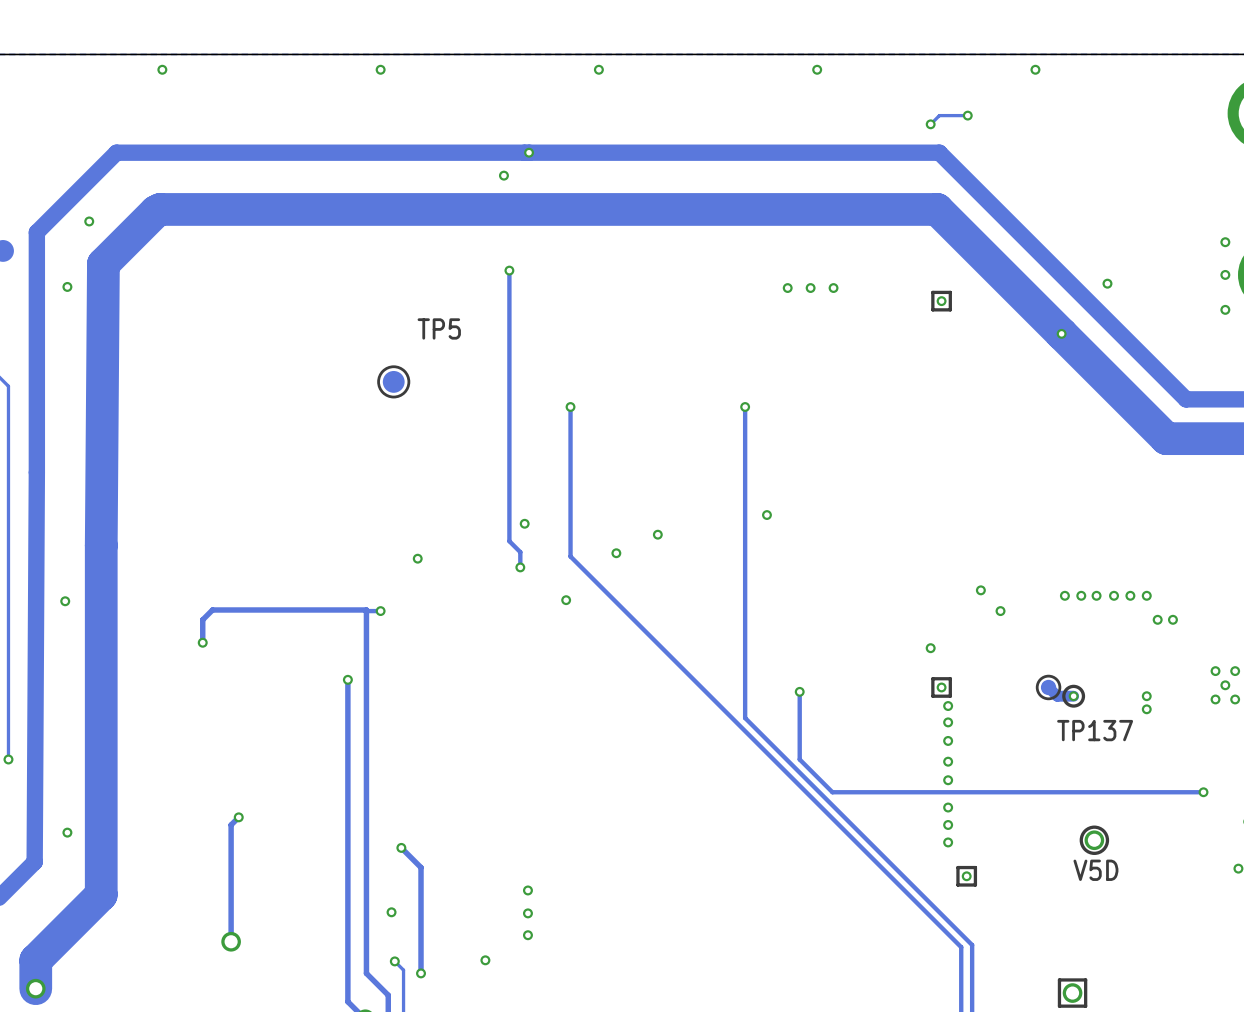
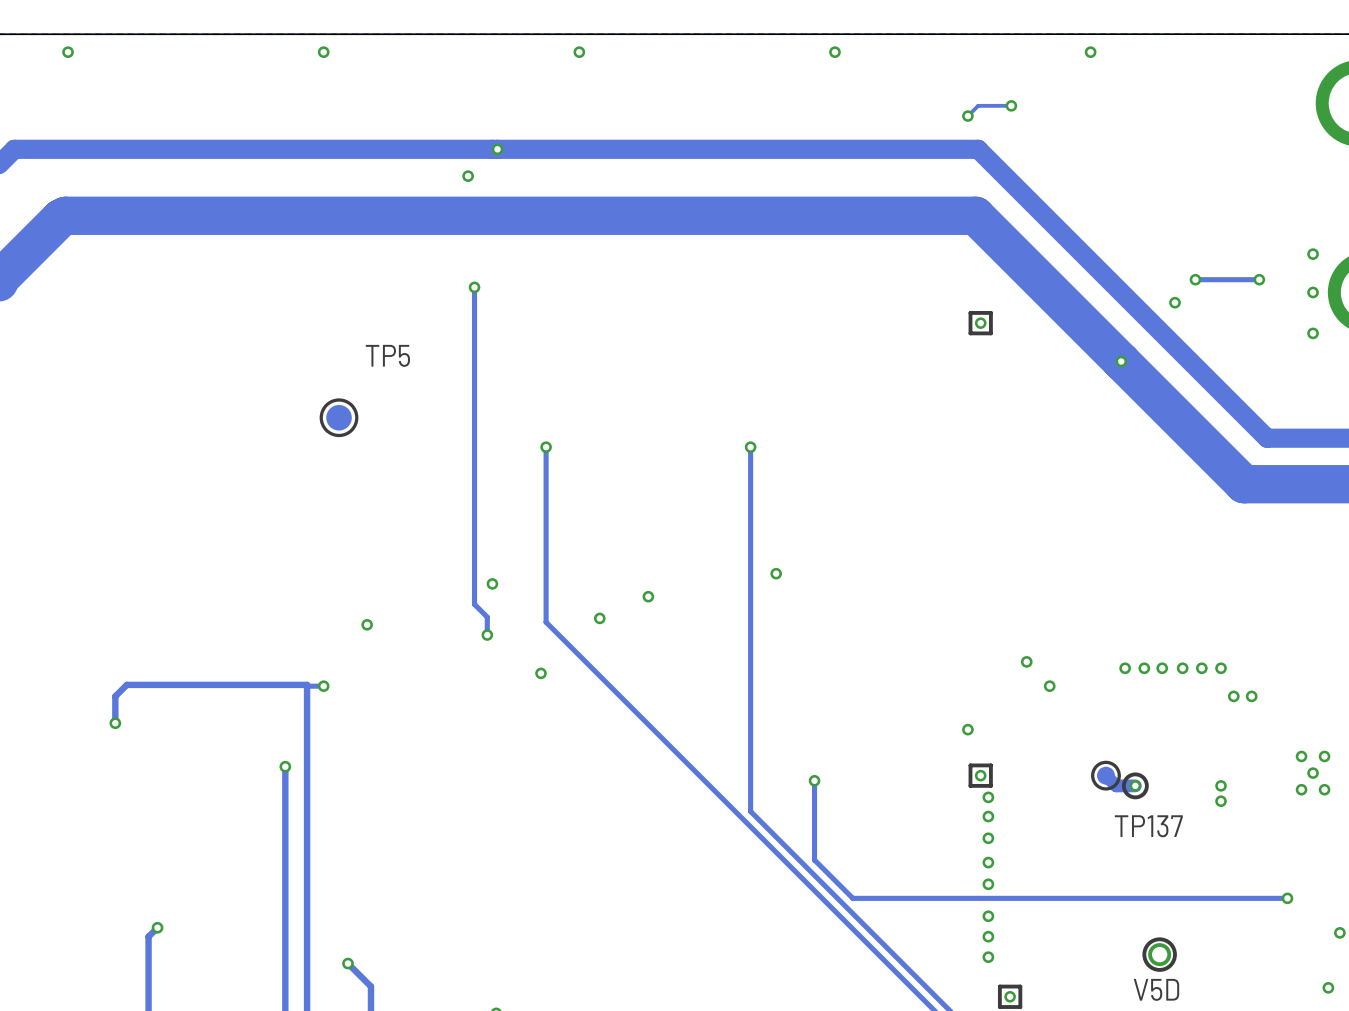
via: none -> (1195, 279)
track: none -> (1259, 279) (1195, 279)
via: none -> (1259, 279)
via: (787, 288) -> none
via: (810, 288) -> none
via: (833, 288) -> none

